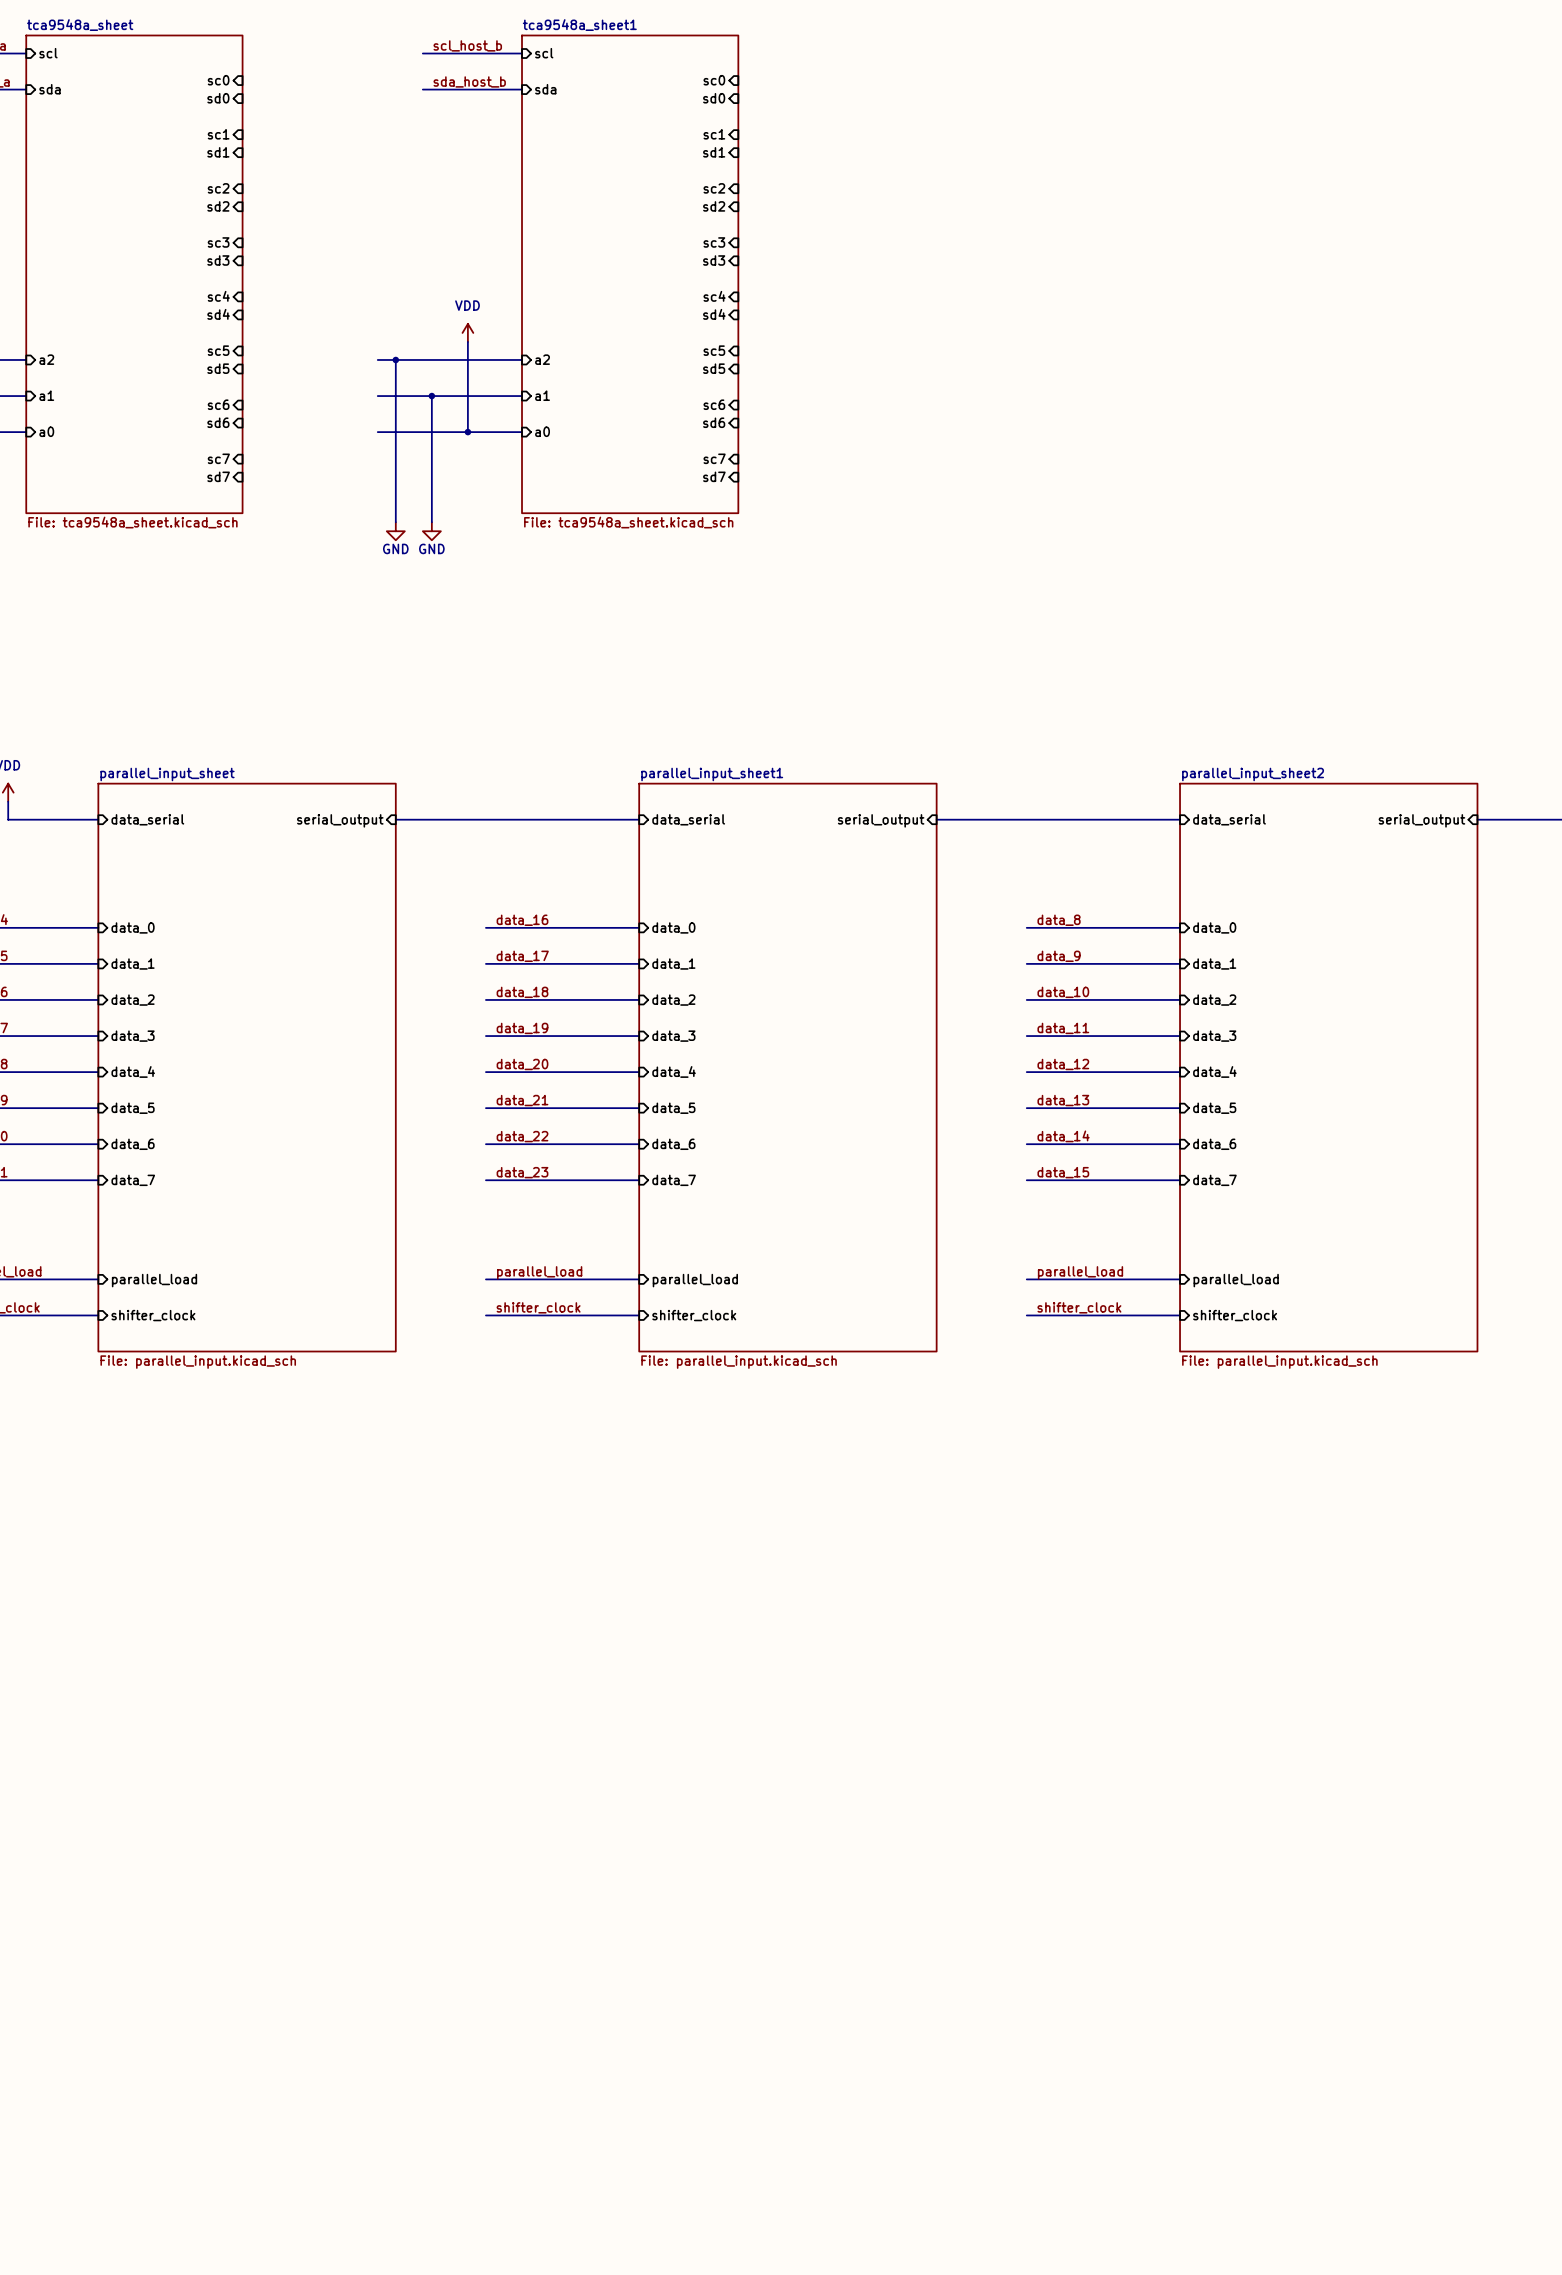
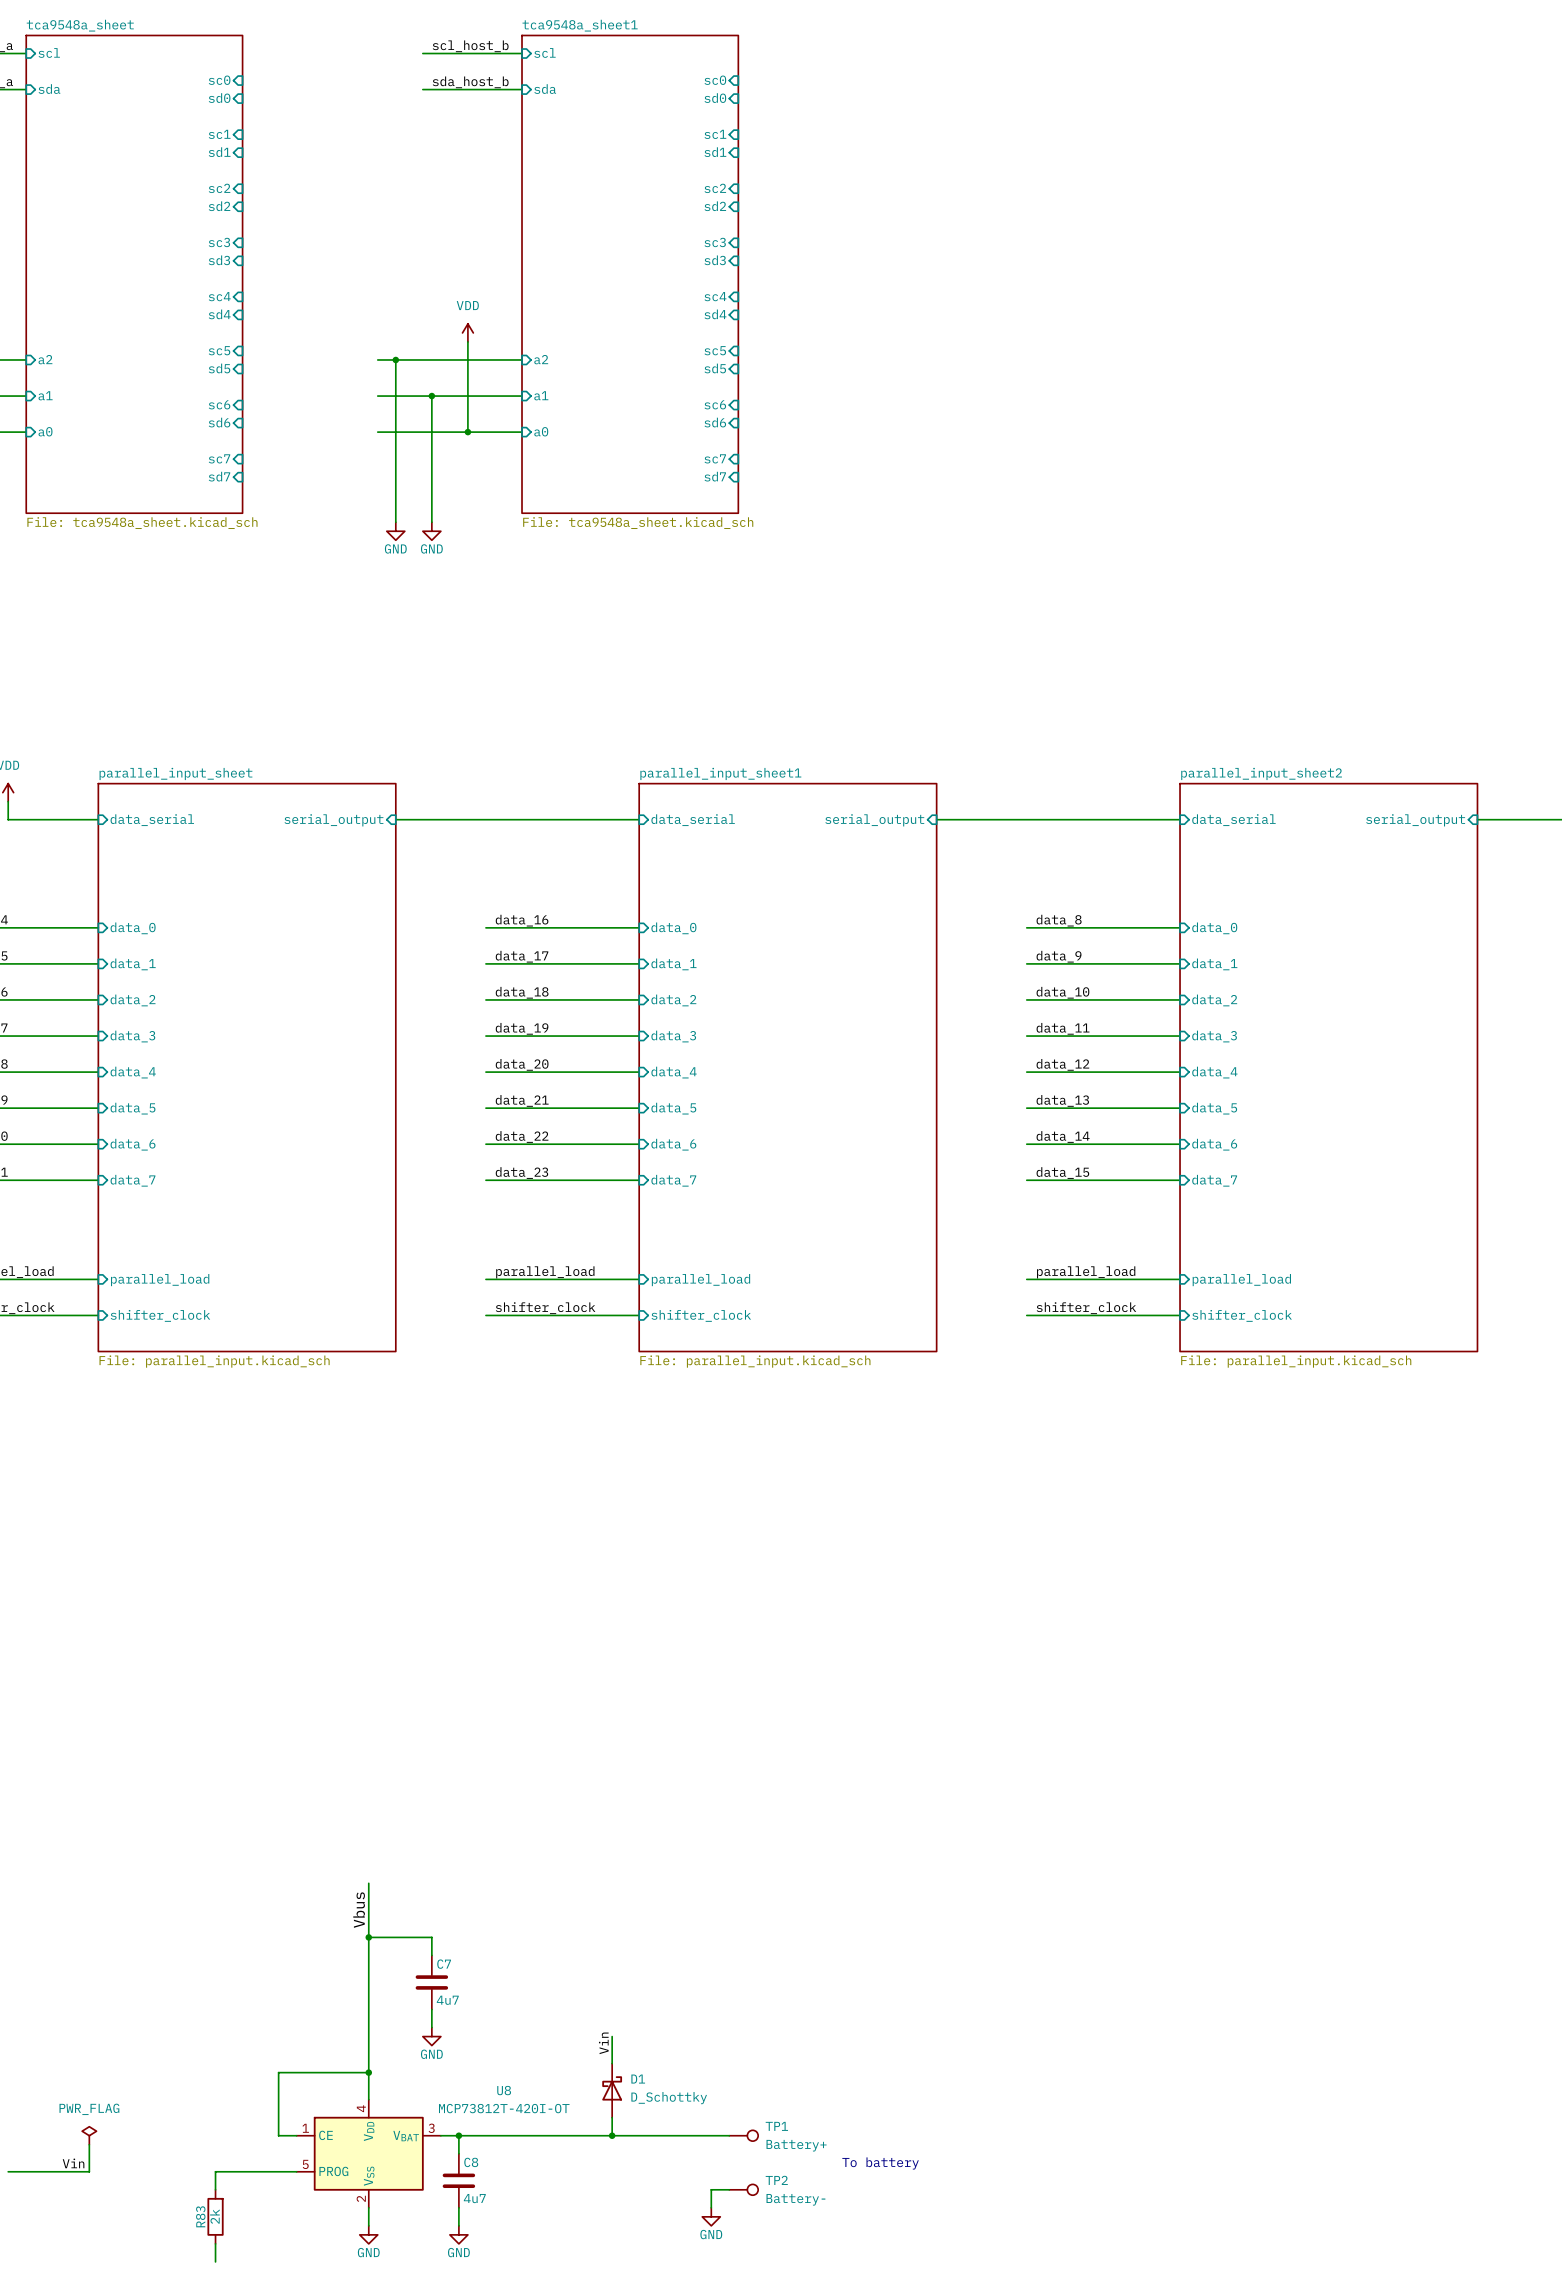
wire: none -> (368, 1883) (368, 2099)
label: none -> Vbus (359, 1910)
wire: none -> (368, 1937) (431, 1937) (431, 1955)
junction: none -> (368, 1937)
C7: none -> 4u7 (431, 1982)
wire: none -> (431, 2009) (431, 2027)
power symbol: none -> GND (431, 2036)
wire: none -> (612, 2036) (612, 2063)
label: none -> Vin (603, 2043)
wire: none -> (368, 2072) (278, 2072) (278, 2135) (296, 2135)
junction: none -> (368, 2072)
D1: none -> D_Schottky (612, 2090)
wire: none -> (612, 2117) (612, 2135)
power symbol: none -> PWR_FLAG (89, 2135)
wire: none -> (440, 2135) (729, 2135)
wire: none -> (458, 2135) (458, 2153)
junction: none -> (458, 2135)
junction: none -> (612, 2135)
TP1: none -> Battery+ (743, 2135)
wire: none -> (89, 2144) (89, 2171) (8, 2171)
U8: none -> MCP73812T-420I-OT (368, 2153)
label: none -> Vin (73, 2163)
text: none -> To battery (880, 2163)
wire: none -> (296, 2171) (215, 2171) (215, 2189)
C8: none -> 4u7 (458, 2180)
wire: none -> (729, 2189) (711, 2189) (711, 2207)
TP2: none -> Battery- (743, 2189)
wire: none -> (368, 2207) (368, 2225)
wire: none -> (458, 2207) (458, 2225)
R83: none -> 2k (215, 2216)
power symbol: none -> GND (711, 2216)
power symbol: none -> GND (368, 2234)
power symbol: none -> GND (458, 2234)
wire: none -> (215, 2243) (215, 2261)

